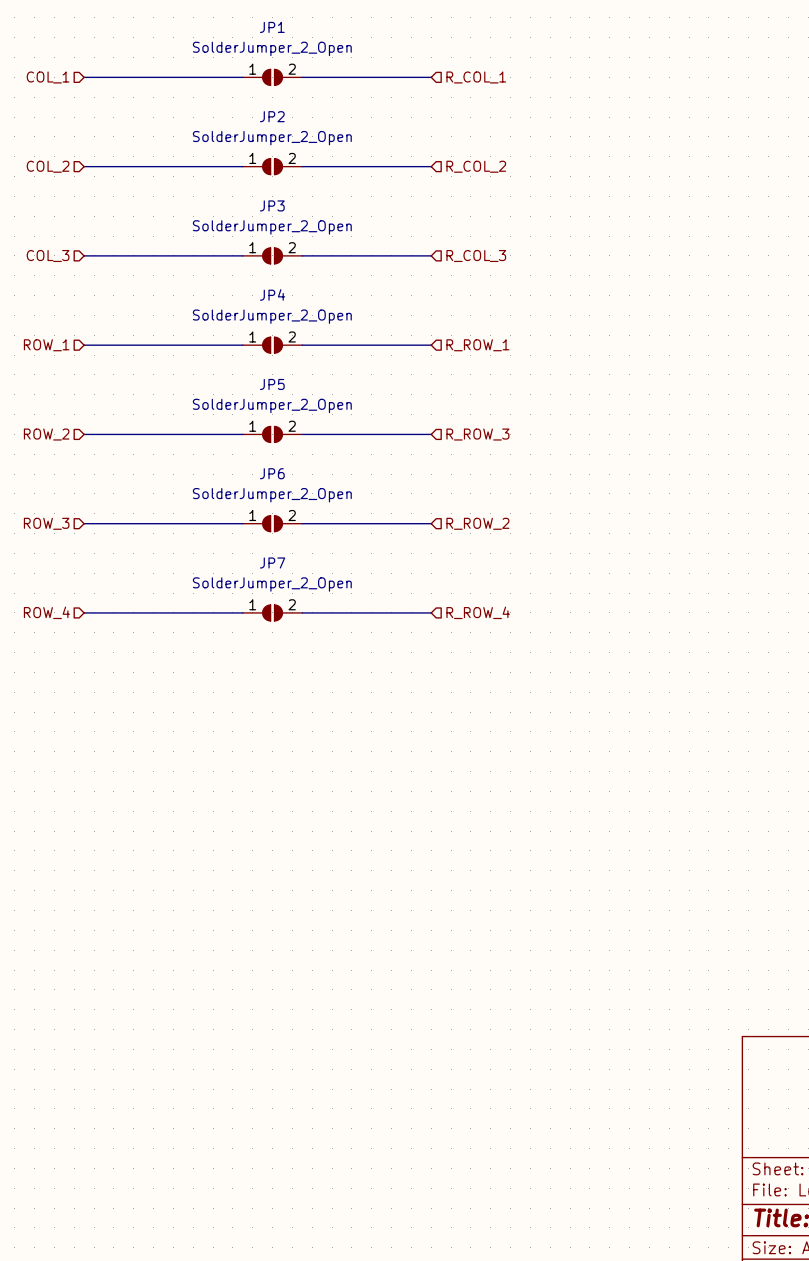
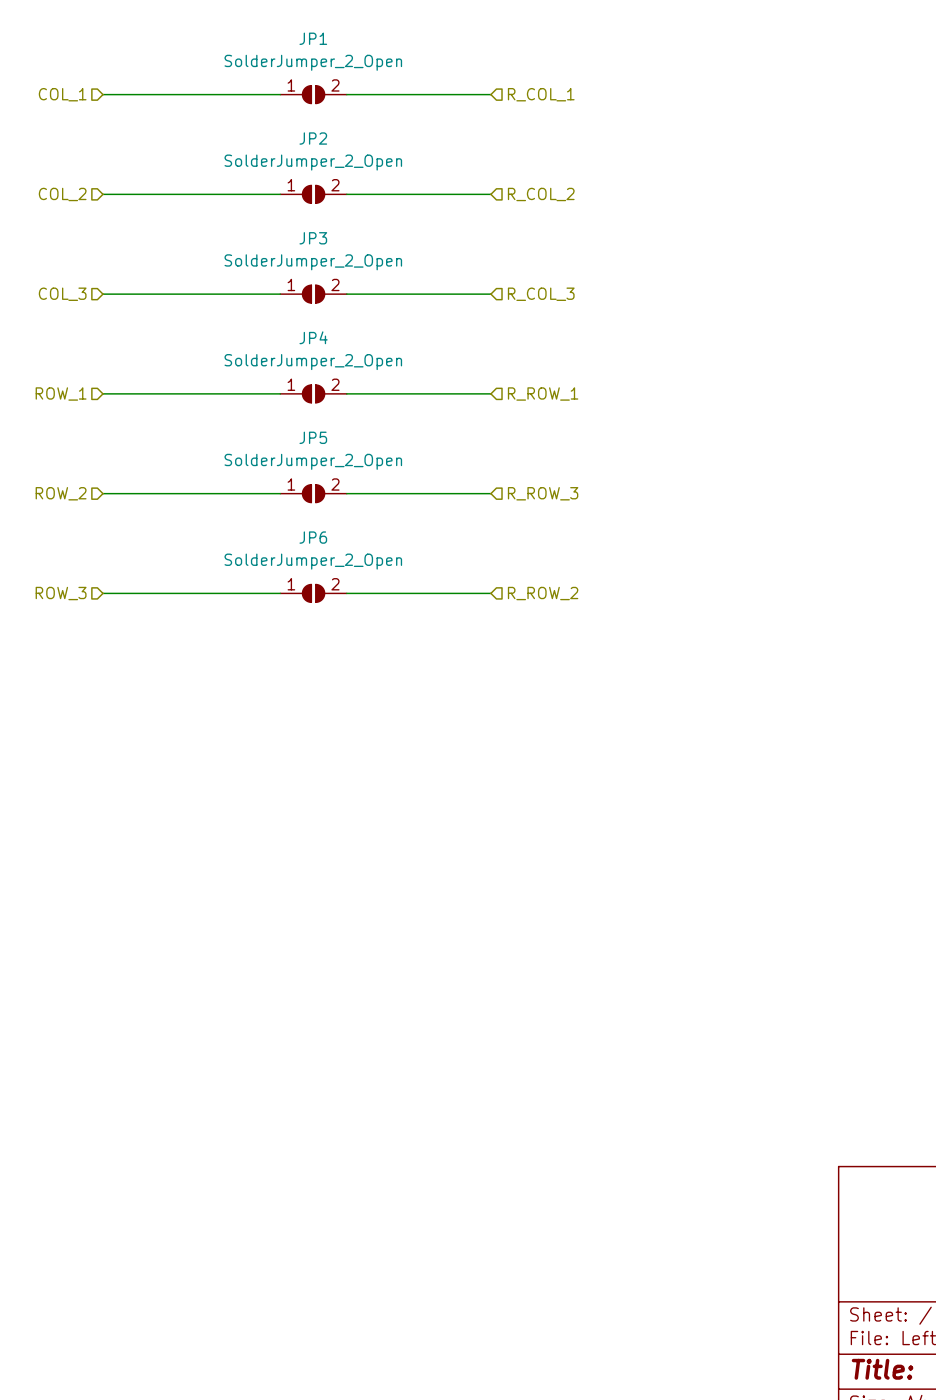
hierarchical label: ROW_4 (46, 612) -> none
wire: (84, 612) (242, 612) -> none
JP7: SolderJumper_2_Open (272, 612) -> none
wire: (302, 612) (431, 612) -> none
hierarchical label: R_ROW_4 (478, 612) -> none

